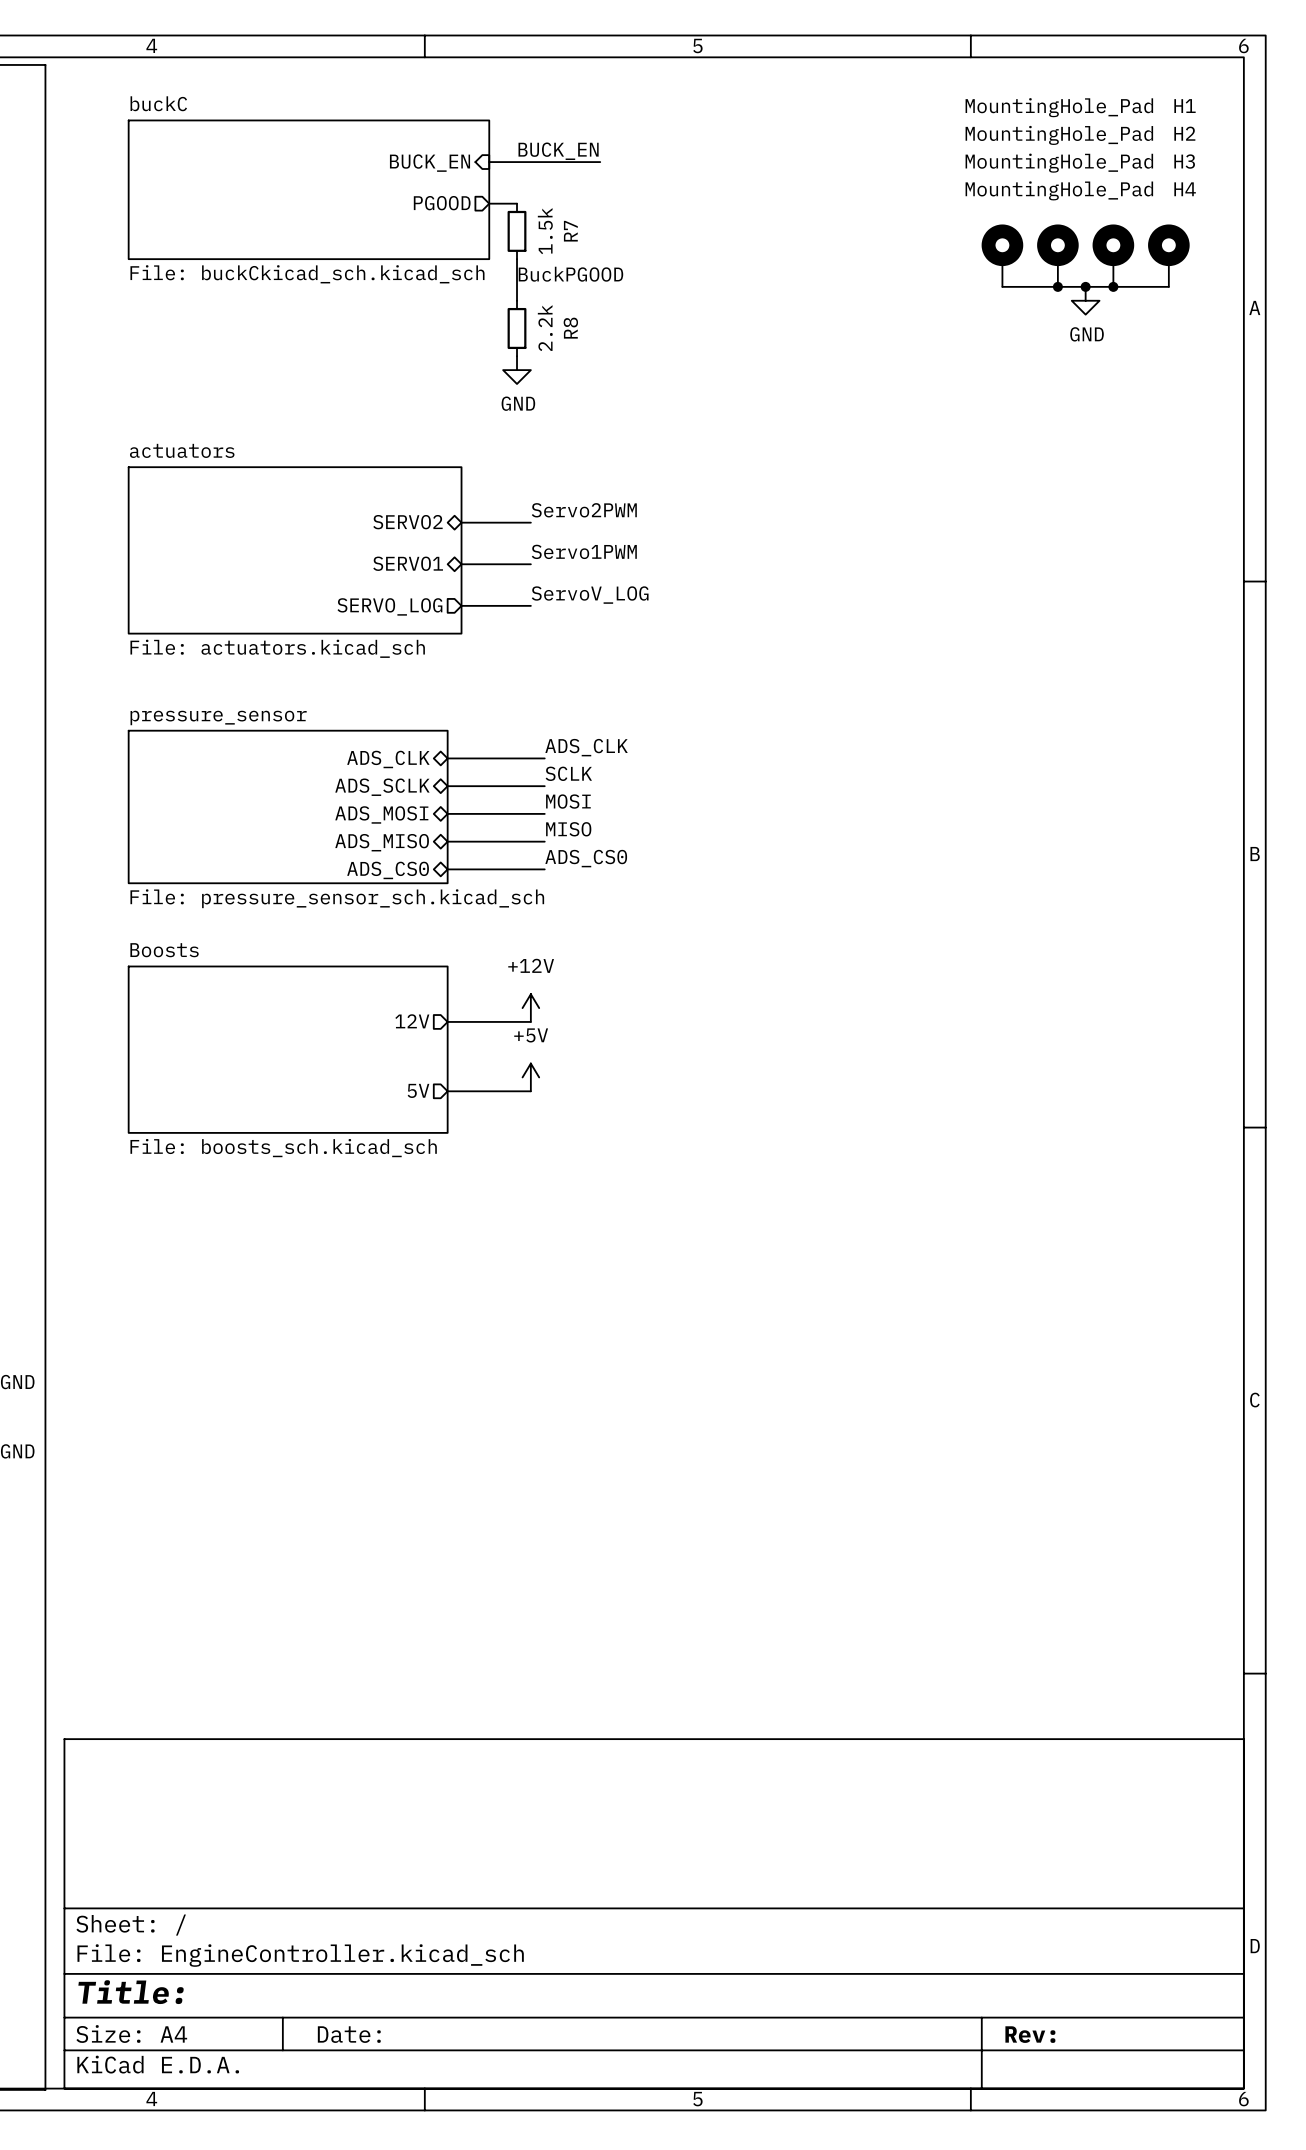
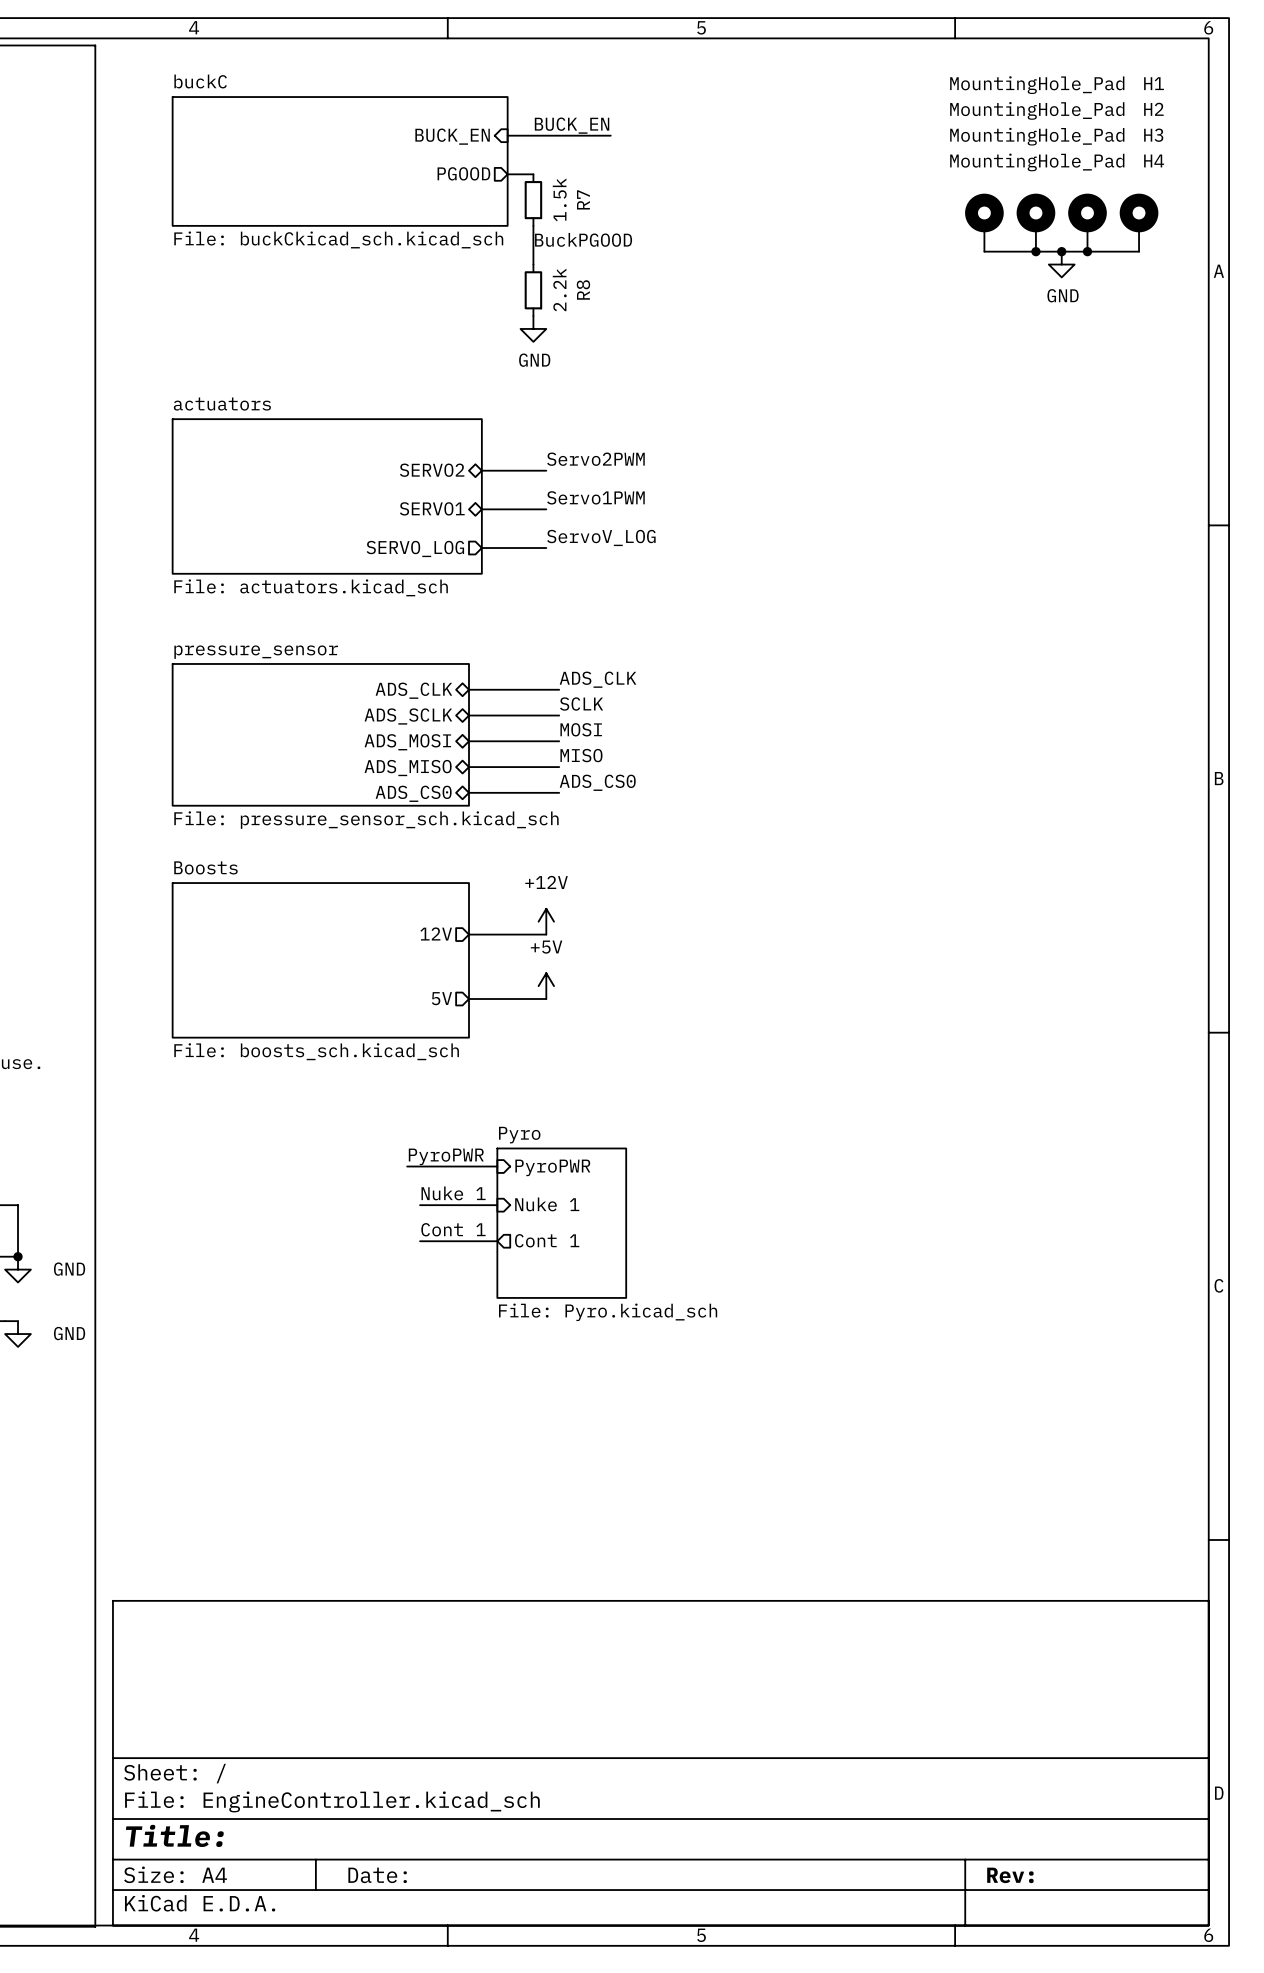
label: none -> PyroPWR (446, 1156)
wire: none -> (407, 1166) (497, 1166)
hierarchical label: none -> PyroPWR (552, 1167)
label: none -> Nuke 1 (453, 1193)
hierarchical label: none -> Nuke 1 (547, 1204)
wire: none -> (420, 1205) (497, 1205)
sheet Pyro: none -> File: Pyro.kicad_sch (561, 1223)
label: none -> Cont 1 (453, 1229)
hierarchical label: none -> Cont 1 (547, 1240)
wire: none -> (420, 1241) (497, 1241)

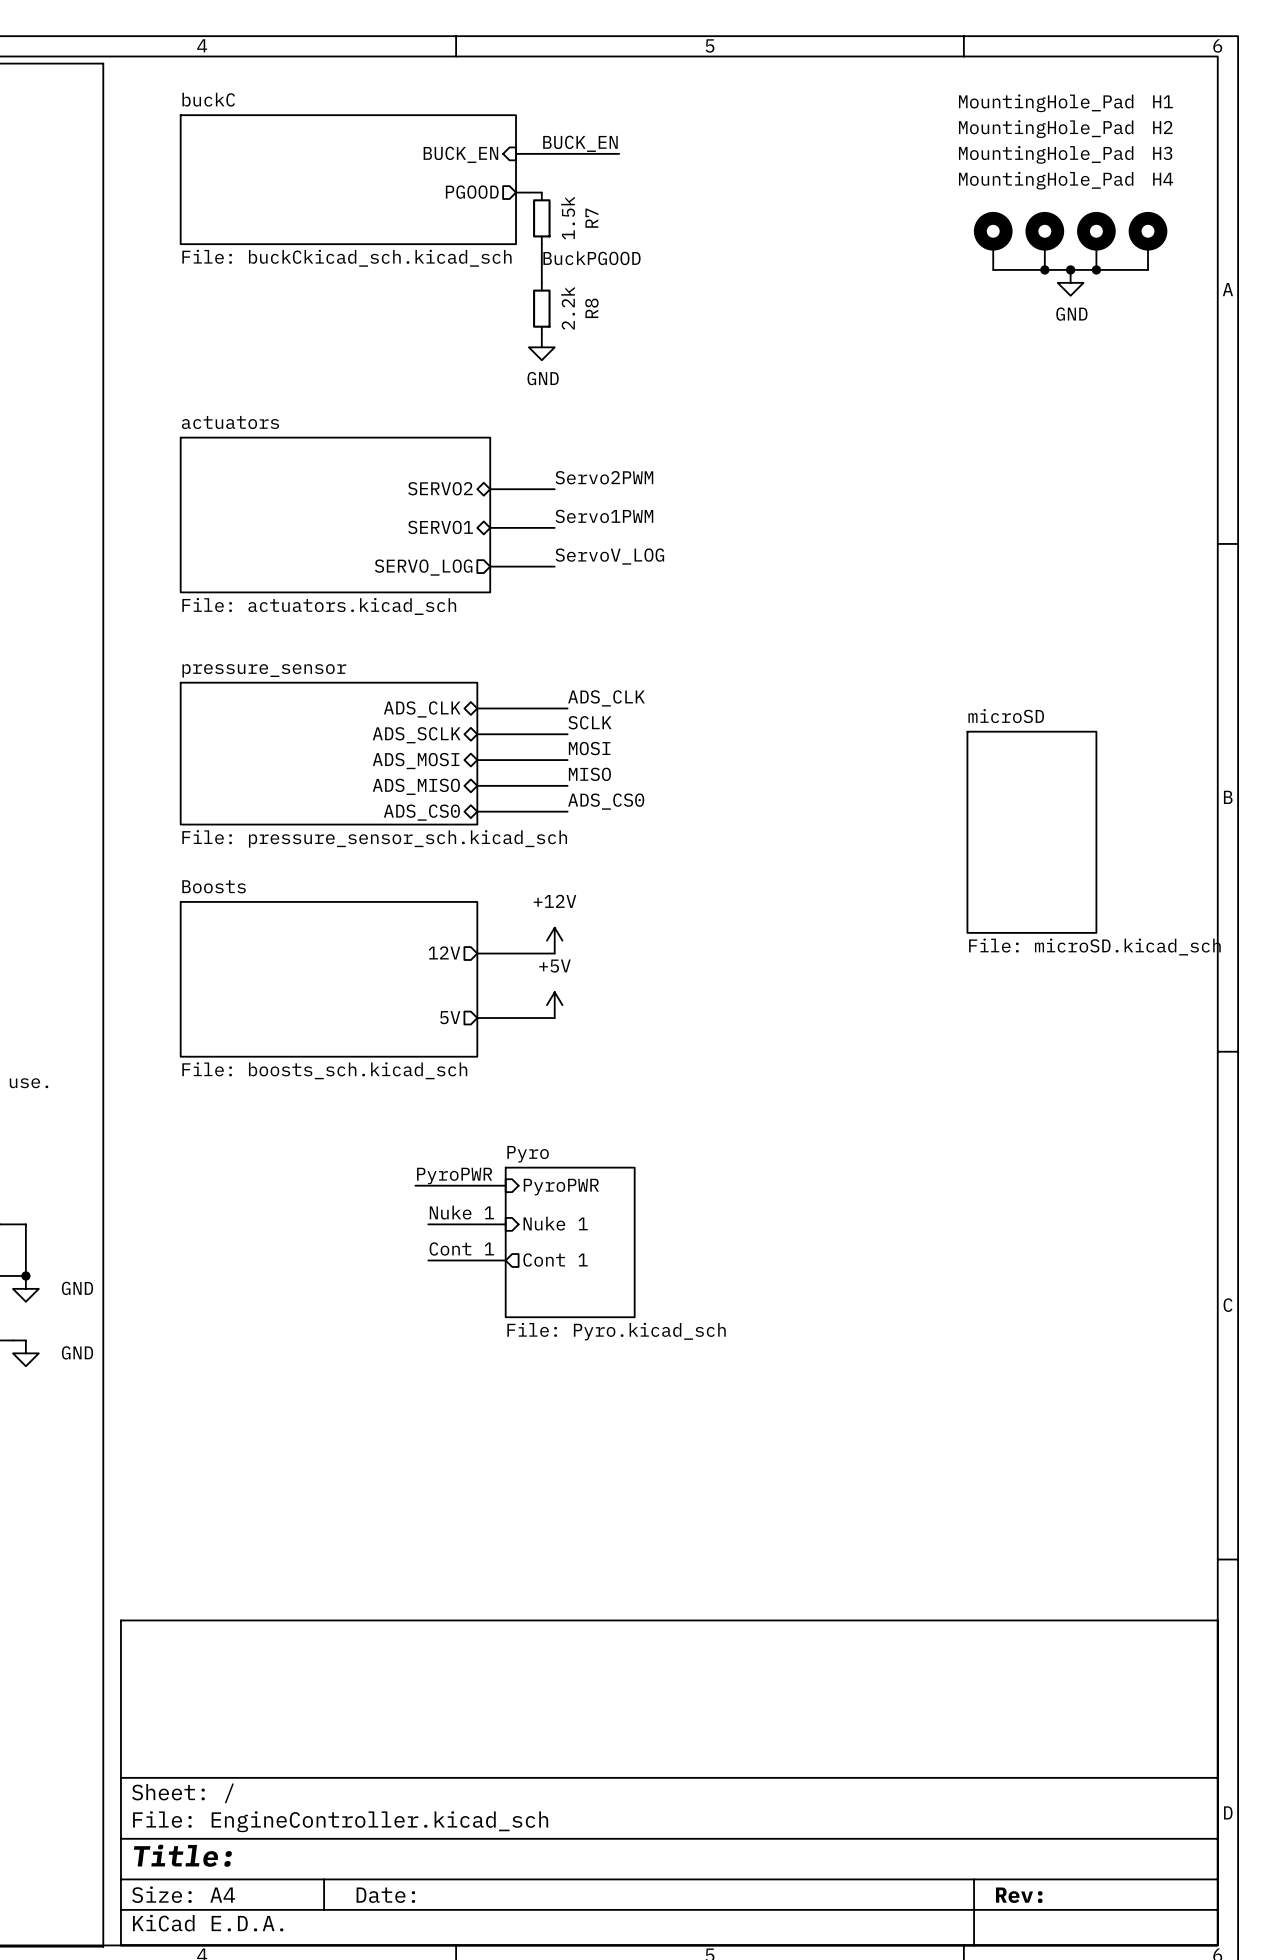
sheet microSD: none -> File: microSD.kicad_sch (1031, 832)

